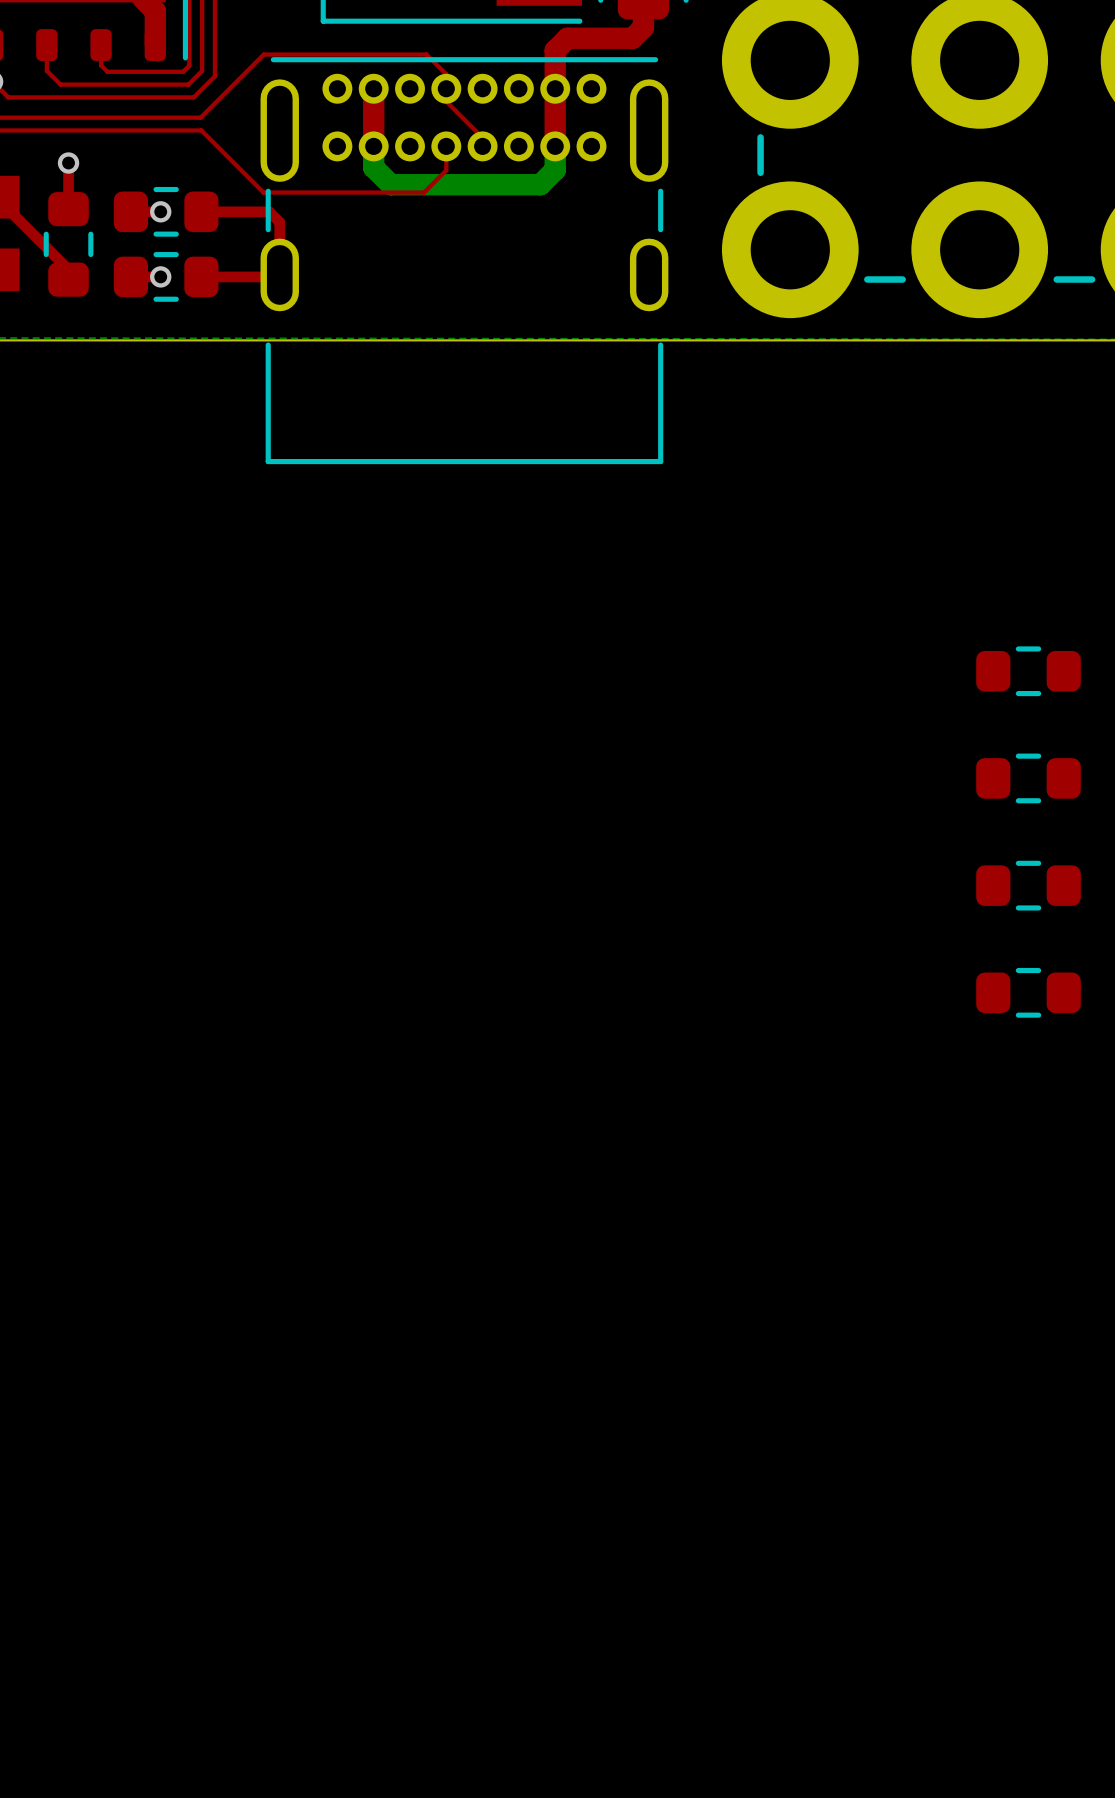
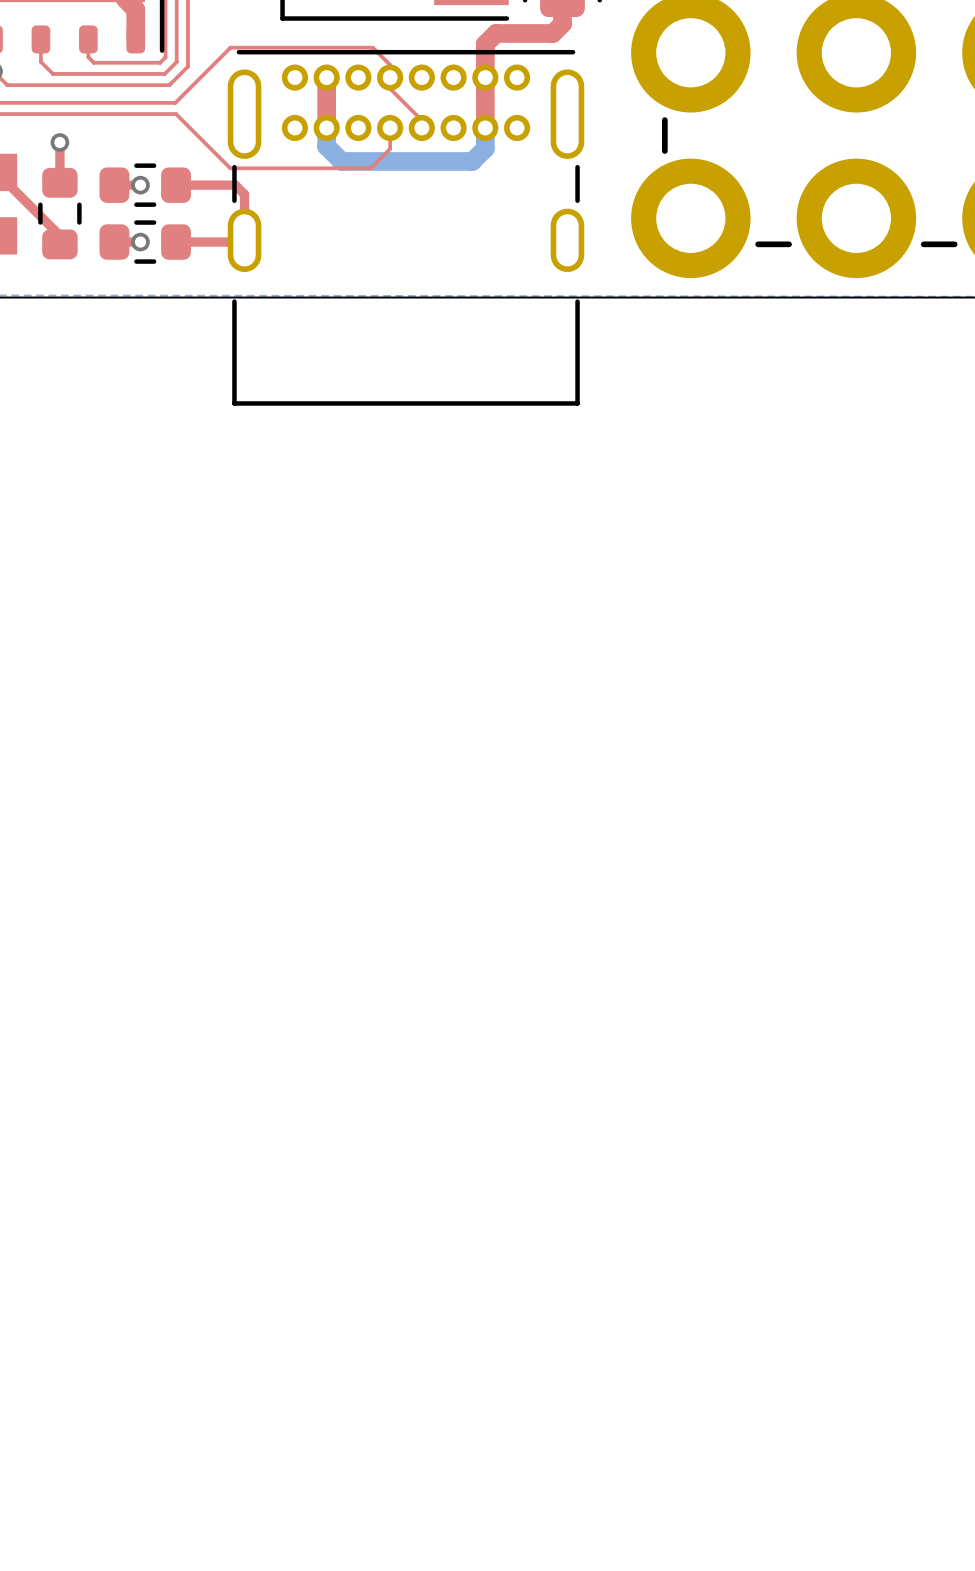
part: (1028, 671) -> none
part: (1028, 778) -> none
part: (1028, 885) -> none
part: (1028, 992) -> none

